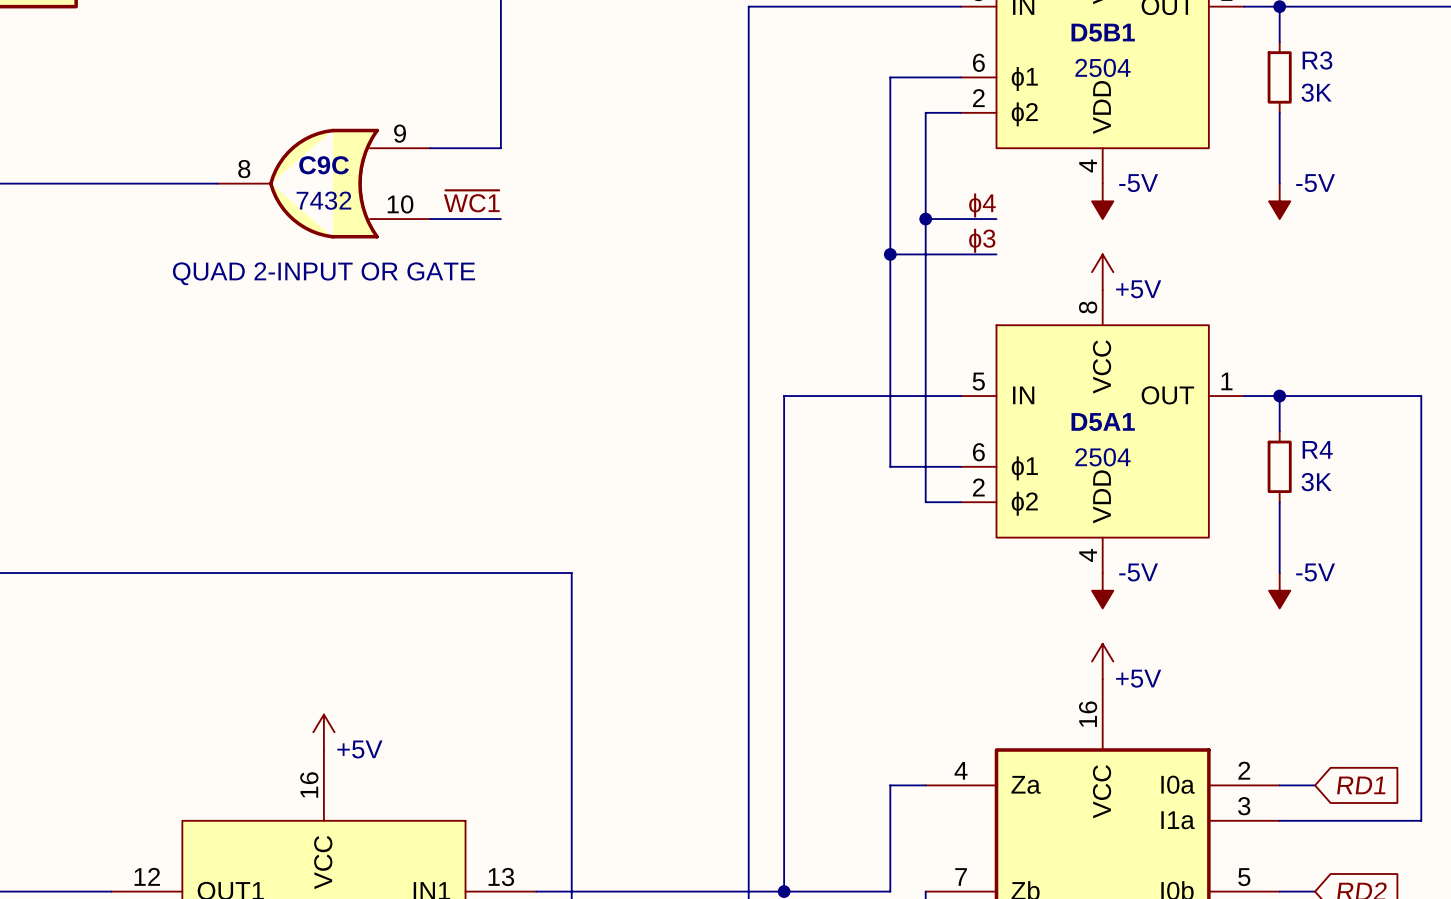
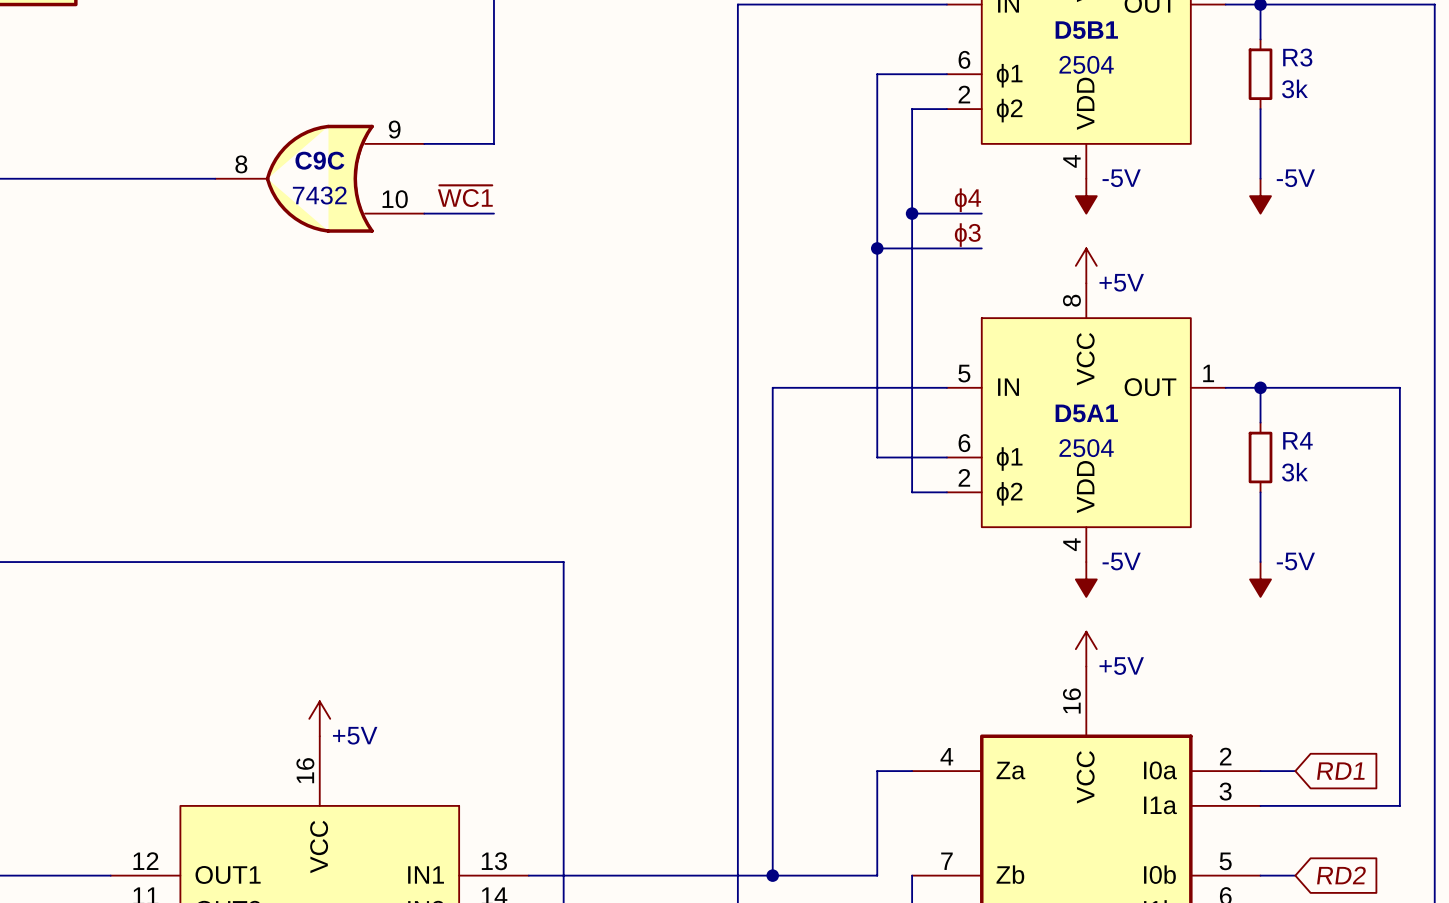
R3 value: 3K (1316, 92) -> 3k (1294, 88)
C9C text: QUAD 2-INPUT OR GATE (323, 273) -> none
R4 value: 3K (1316, 482) -> 3k (1294, 472)

